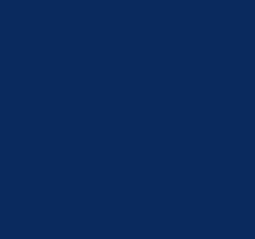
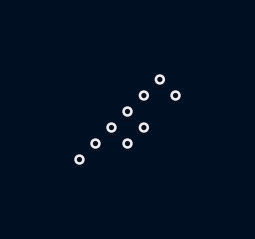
via: none -> (159, 79)
via: none -> (143, 95)
via: none -> (175, 95)
via: none -> (127, 111)
via: none -> (111, 127)
via: none -> (143, 127)
via: none -> (95, 143)
via: none -> (127, 143)
via: none -> (79, 159)

